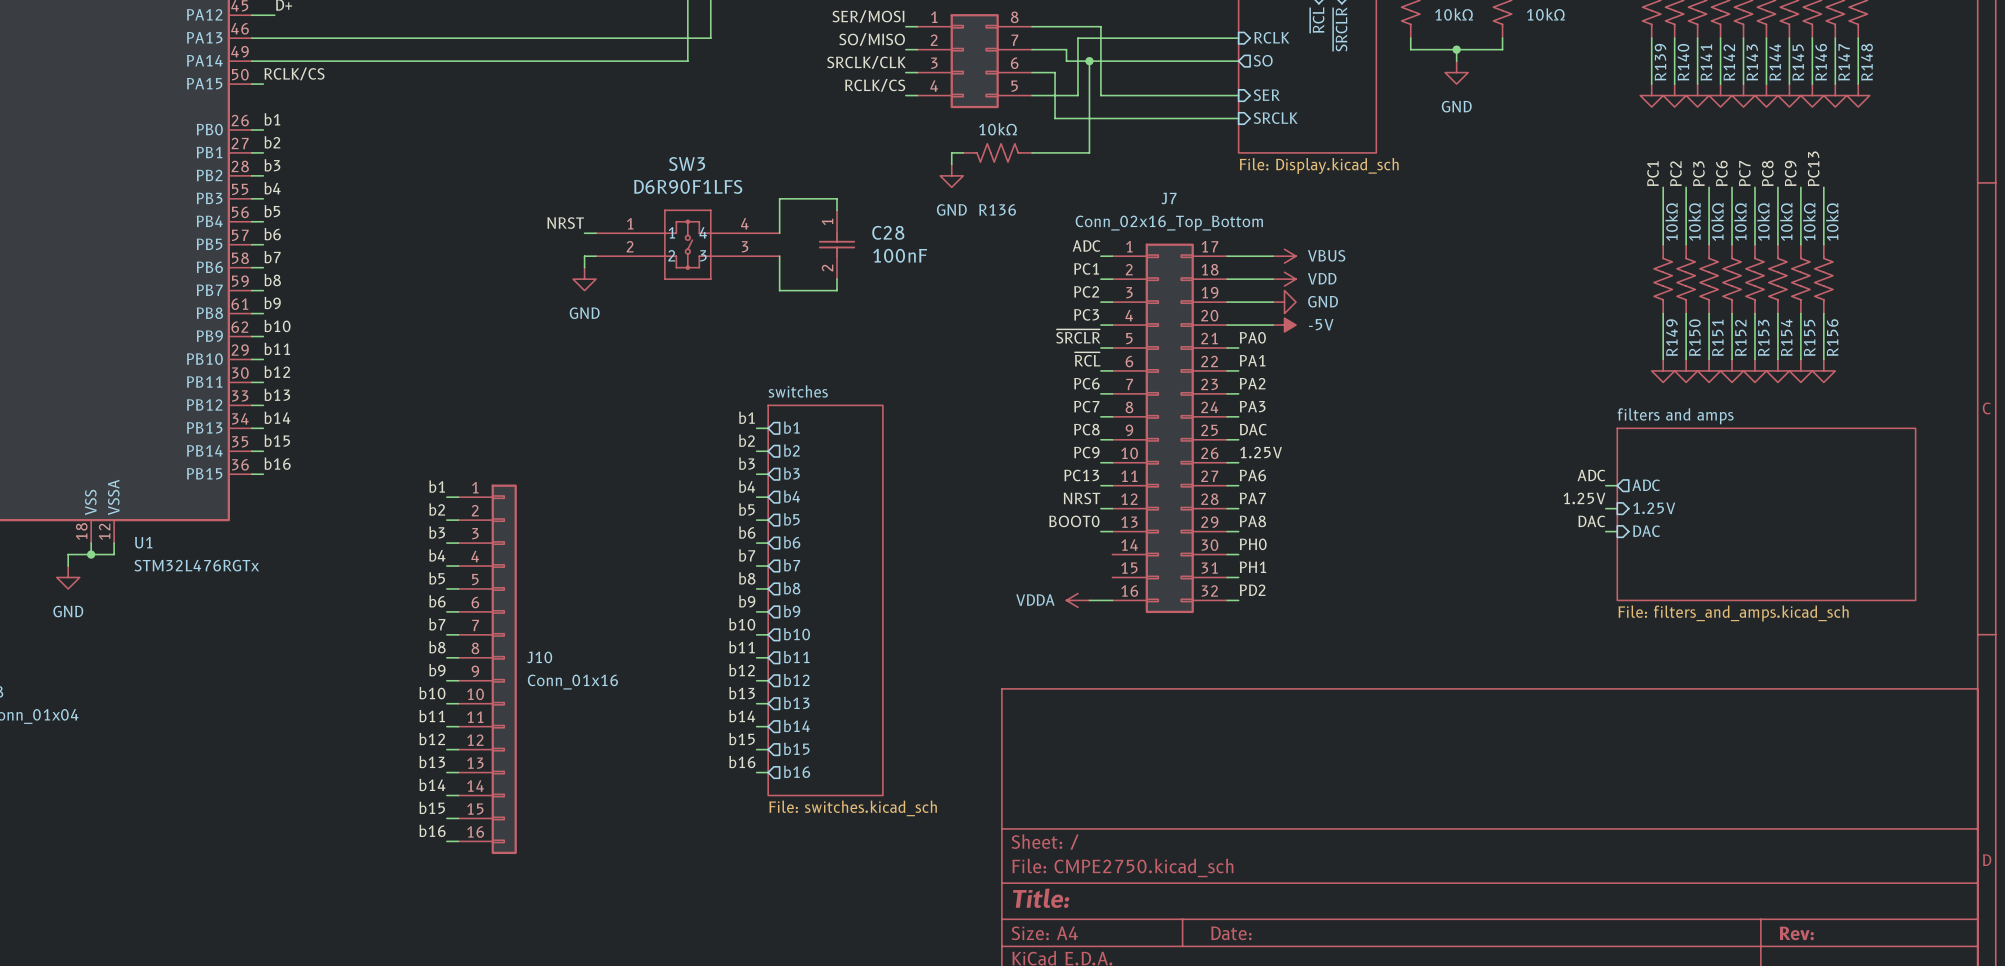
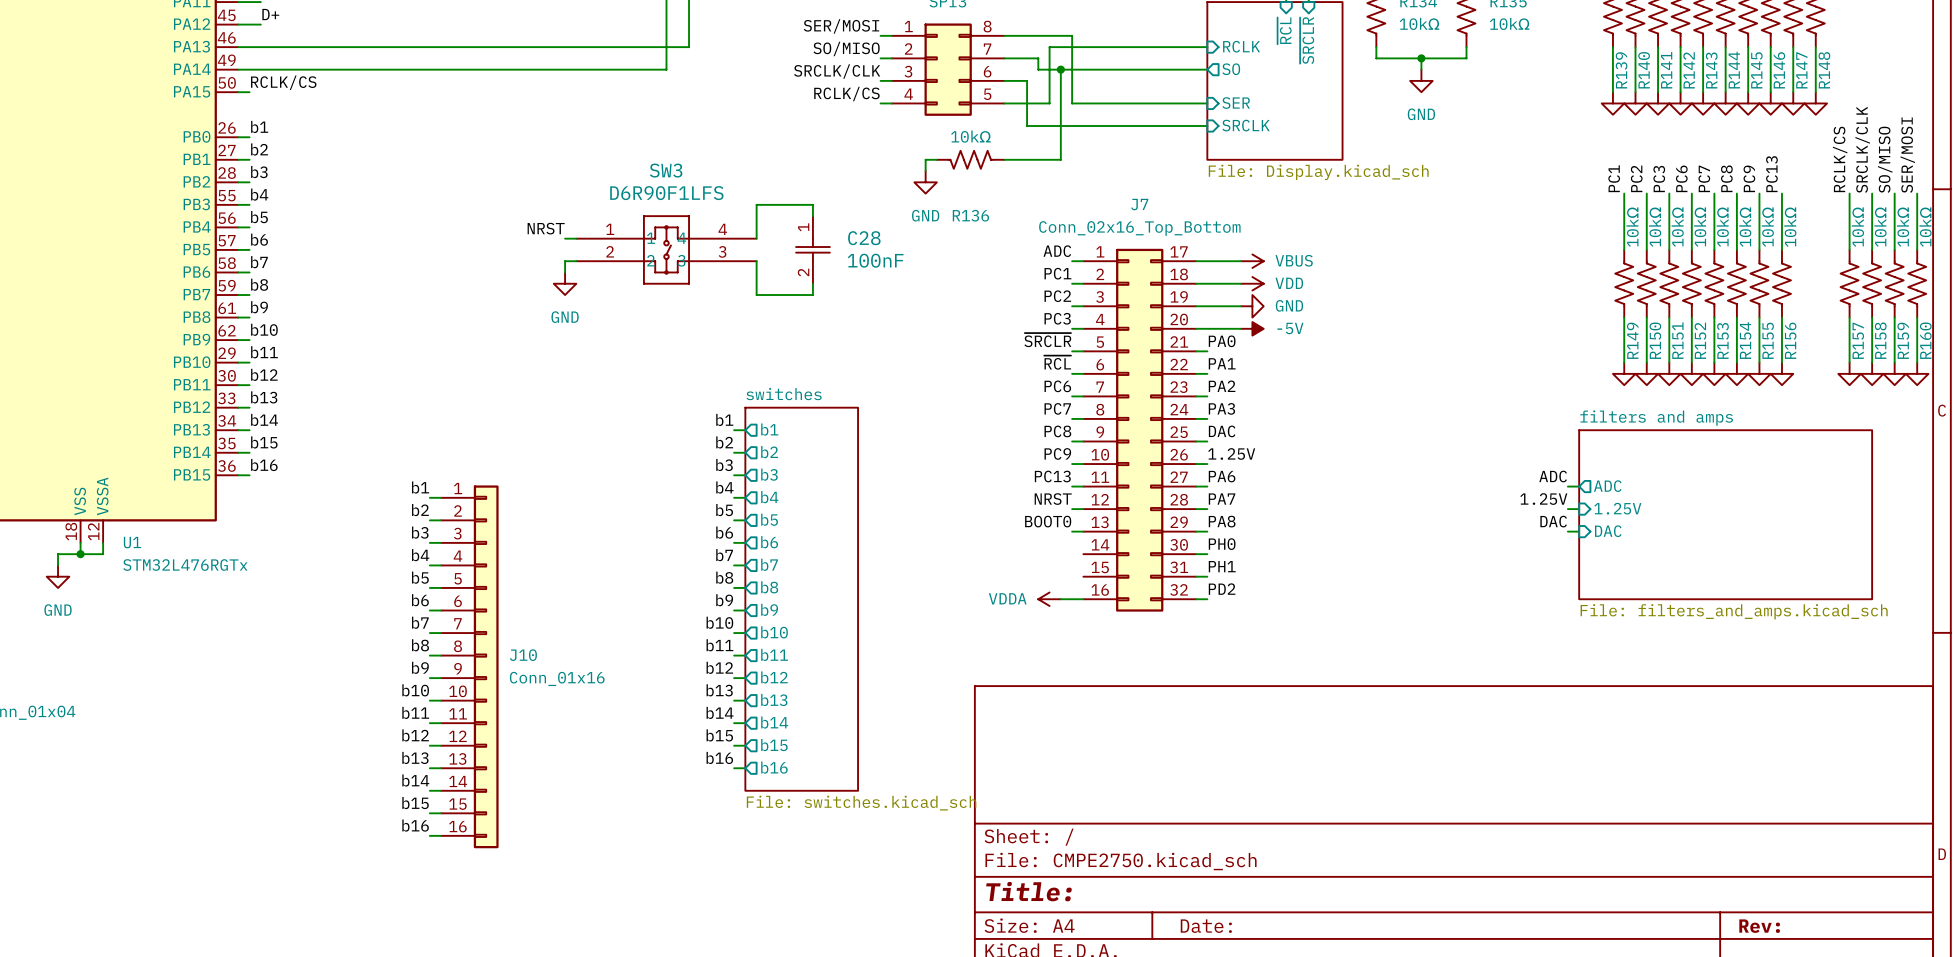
label: none -> SRCLK/CLK (1862, 149)
label: none -> SER/MOSI (1907, 155)
label: none -> SO/MISO (1885, 159)
label: none -> RCLK/CS (1840, 159)
wire: none -> (1849, 193) (1849, 249)
wire: none -> (1872, 193) (1872, 249)
wire: none -> (1894, 193) (1894, 249)
wire: none -> (1917, 193) (1917, 249)
R157: none -> 10kΩ (1849, 283)
R158: none -> 10kΩ (1872, 283)
R159: none -> 10kΩ (1894, 283)
R160: none -> 10kΩ (1917, 283)
wire: none -> (1849, 317) (1849, 362)
wire: none -> (1872, 317) (1872, 362)
wire: none -> (1894, 317) (1894, 362)
wire: none -> (1917, 317) (1917, 362)
power symbol: none -> (1849, 373)
power symbol: none -> (1872, 373)
power symbol: none -> (1894, 373)
power symbol: none -> (1917, 373)

